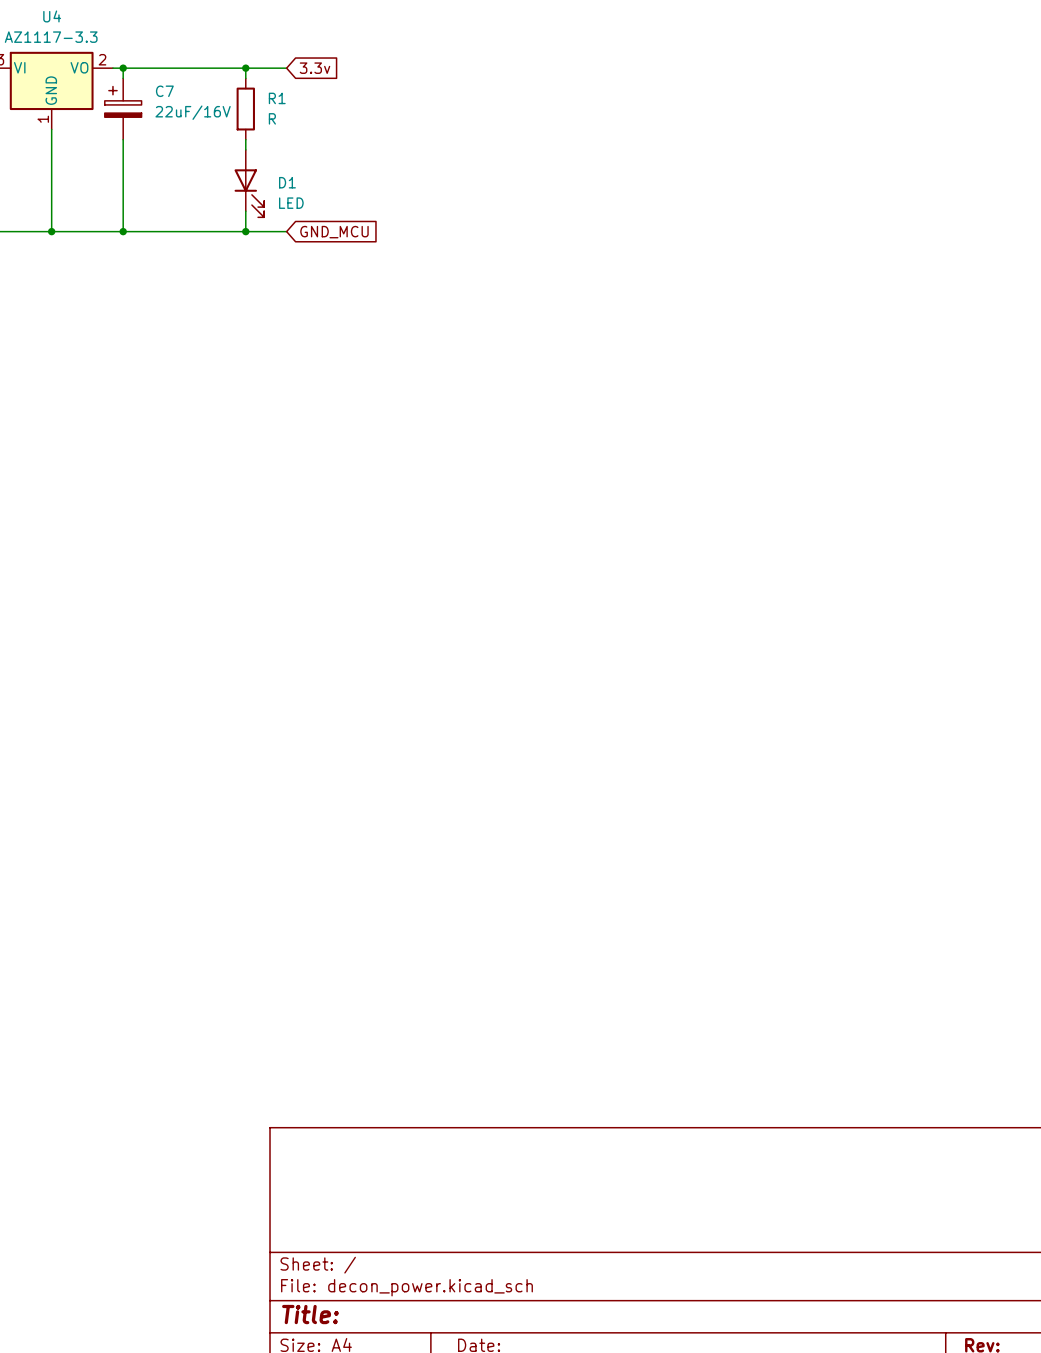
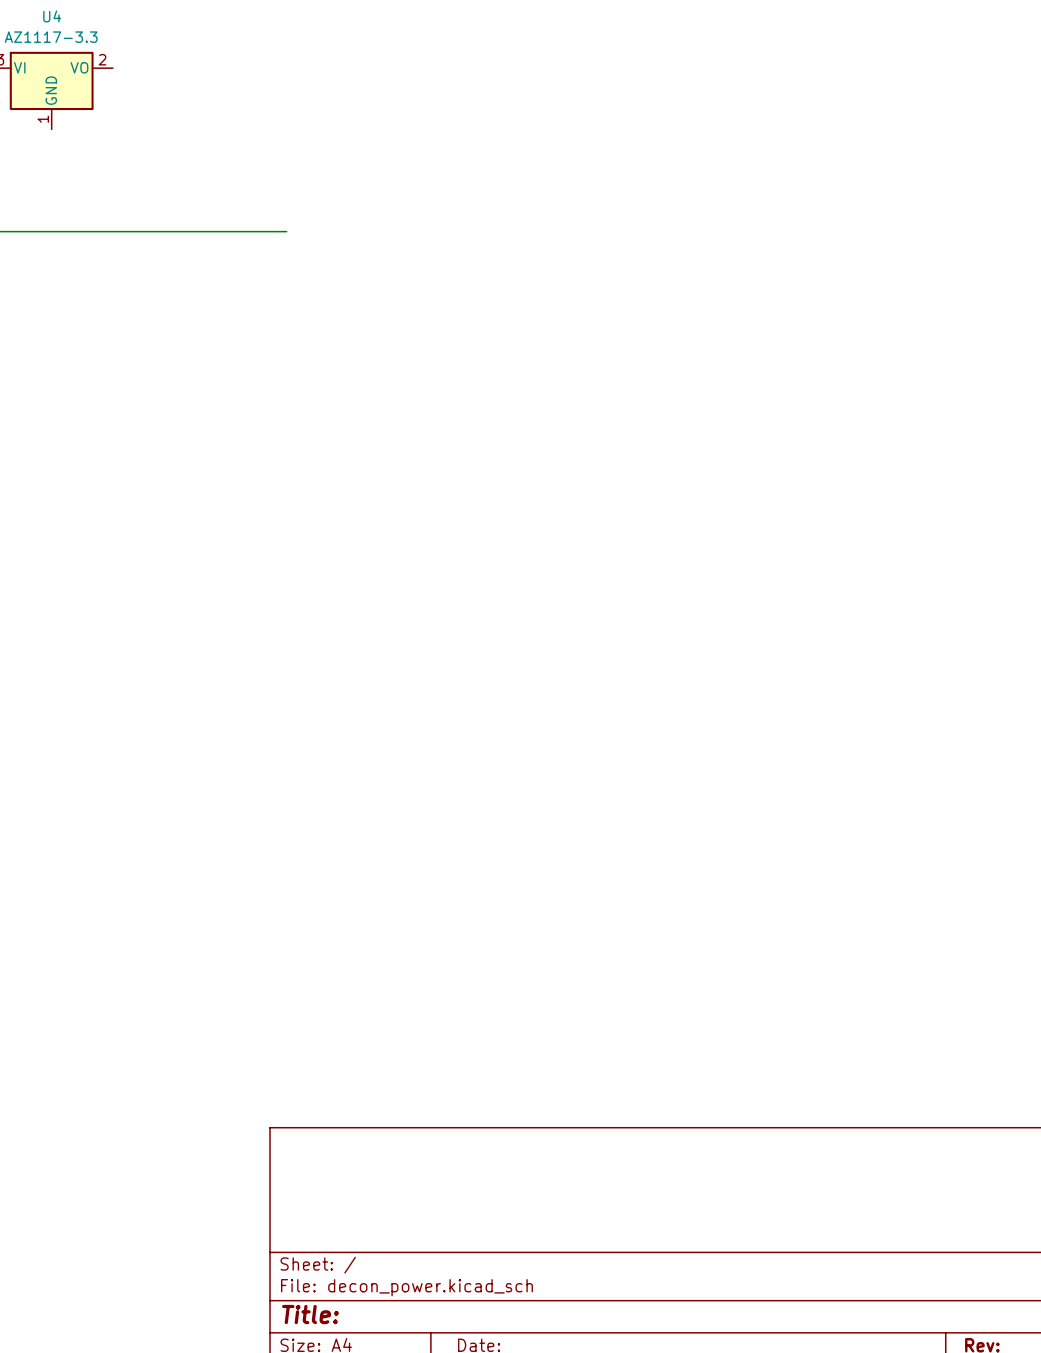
wire: (112, 68) (286, 68) -> none
wire: (123, 68) (123, 78) -> none
junction: (123, 68) -> none
wire: (245, 68) (245, 78) -> none
junction: (245, 68) -> none
global label: 3.3v (315, 68) -> none
C7: 22uF/16V (123, 109) -> none
R1: R (245, 109) -> none
wire: (51, 129) (51, 231) -> none
wire: (123, 139) (123, 231) -> none
wire: (245, 139) (245, 149) -> none
D1: LED (249, 183) -> none
wire: (245, 211) (245, 231) -> none
junction: (51, 231) -> none
junction: (123, 231) -> none
junction: (245, 231) -> none
global label: GND_MCU (334, 232) -> none

